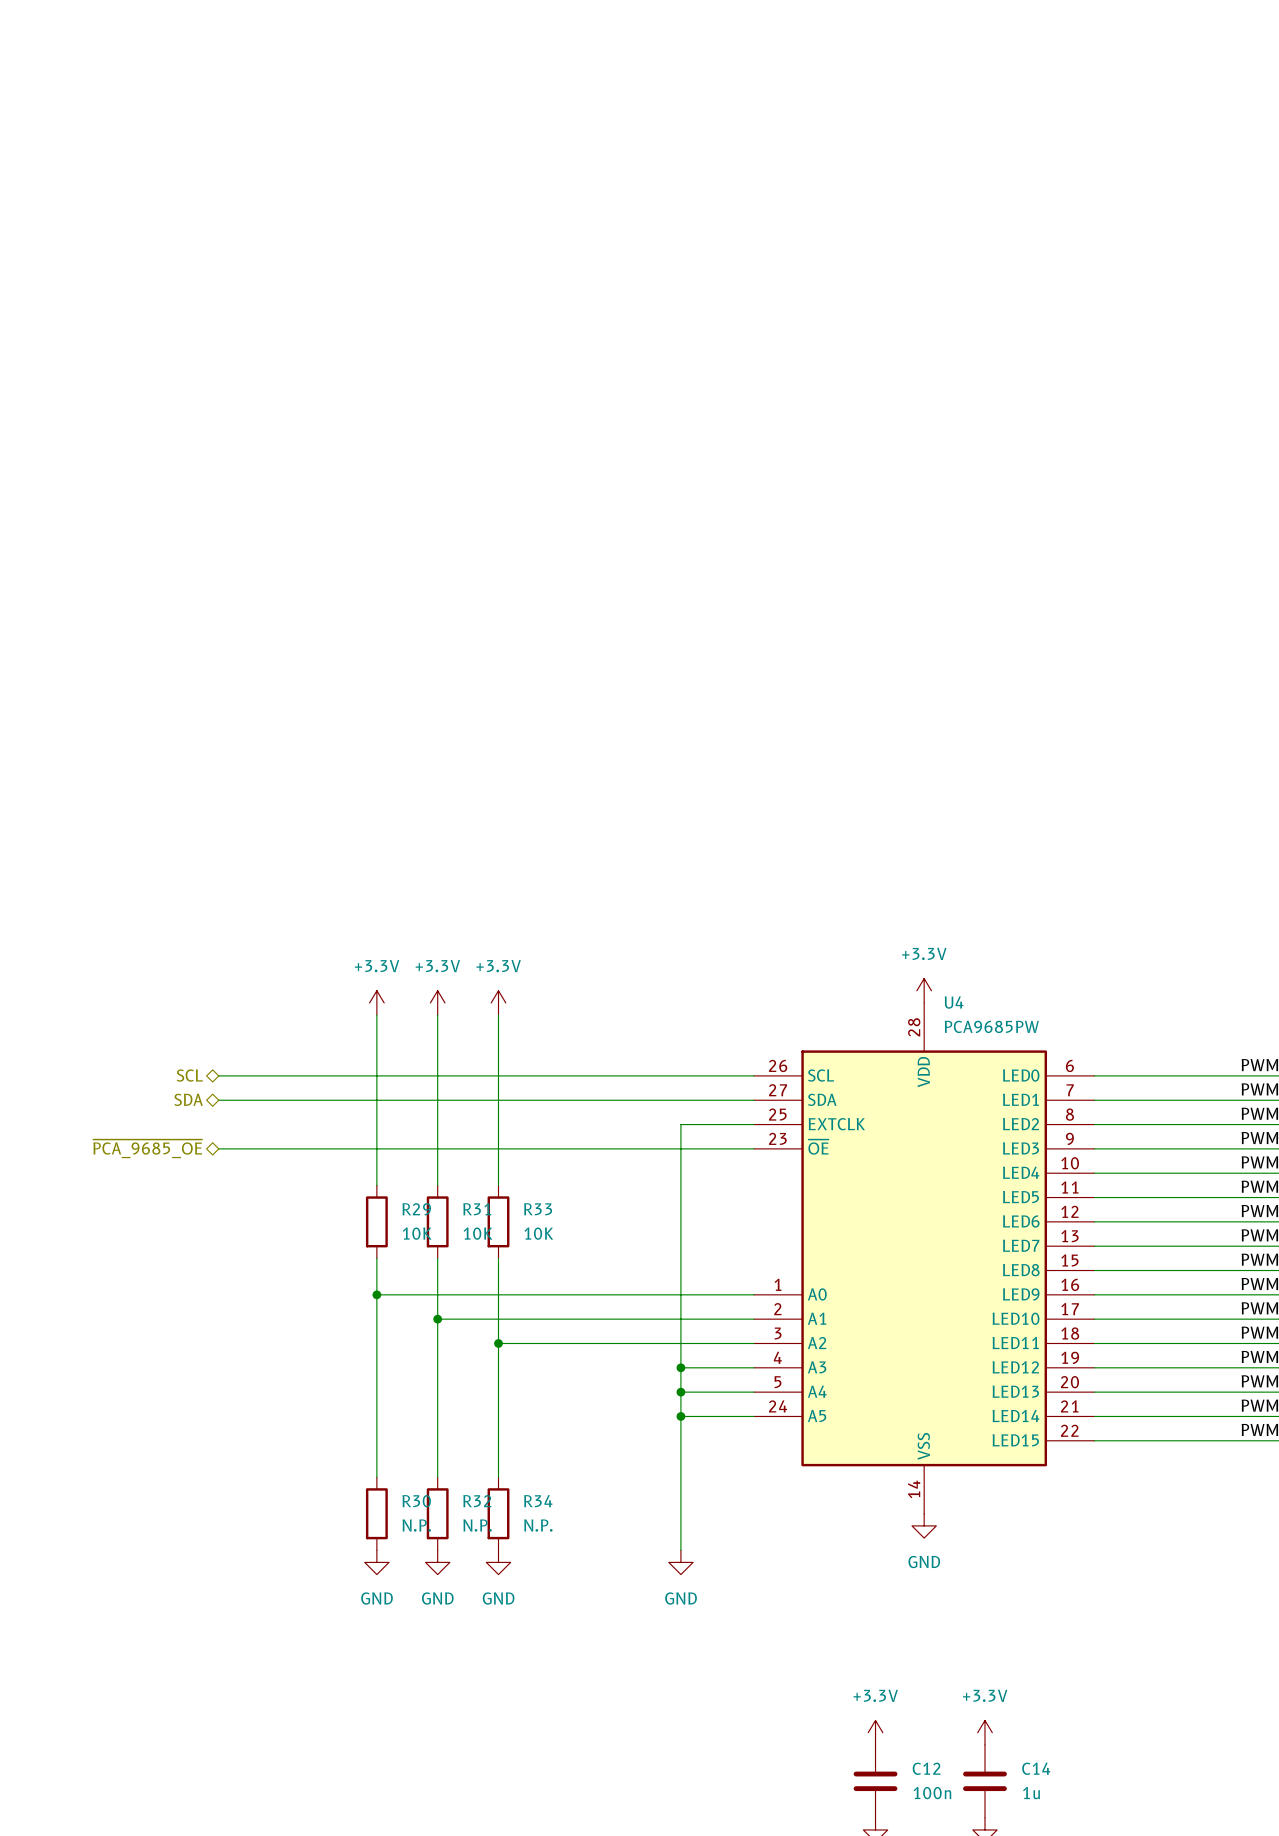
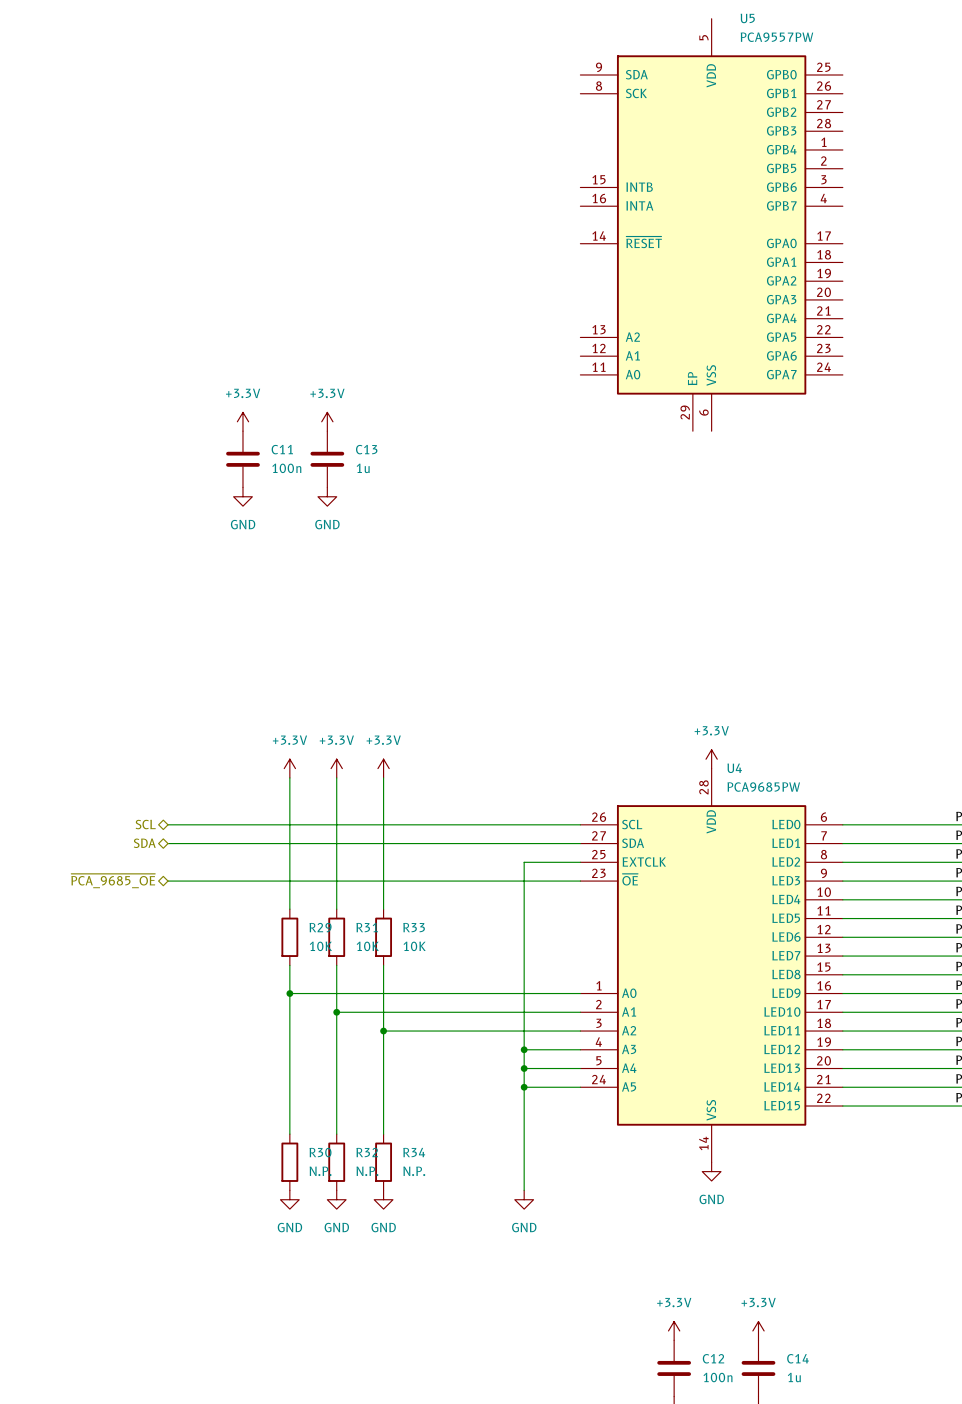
U5: none -> PCA9557PW (711, 224)
power symbol: none -> +3.3V (242, 421)
power symbol: none -> +3.3V (327, 421)
C11: none -> 100n (242, 459)
C13: none -> 1u (327, 459)
power symbol: none -> GND (242, 496)
power symbol: none -> GND (327, 496)

